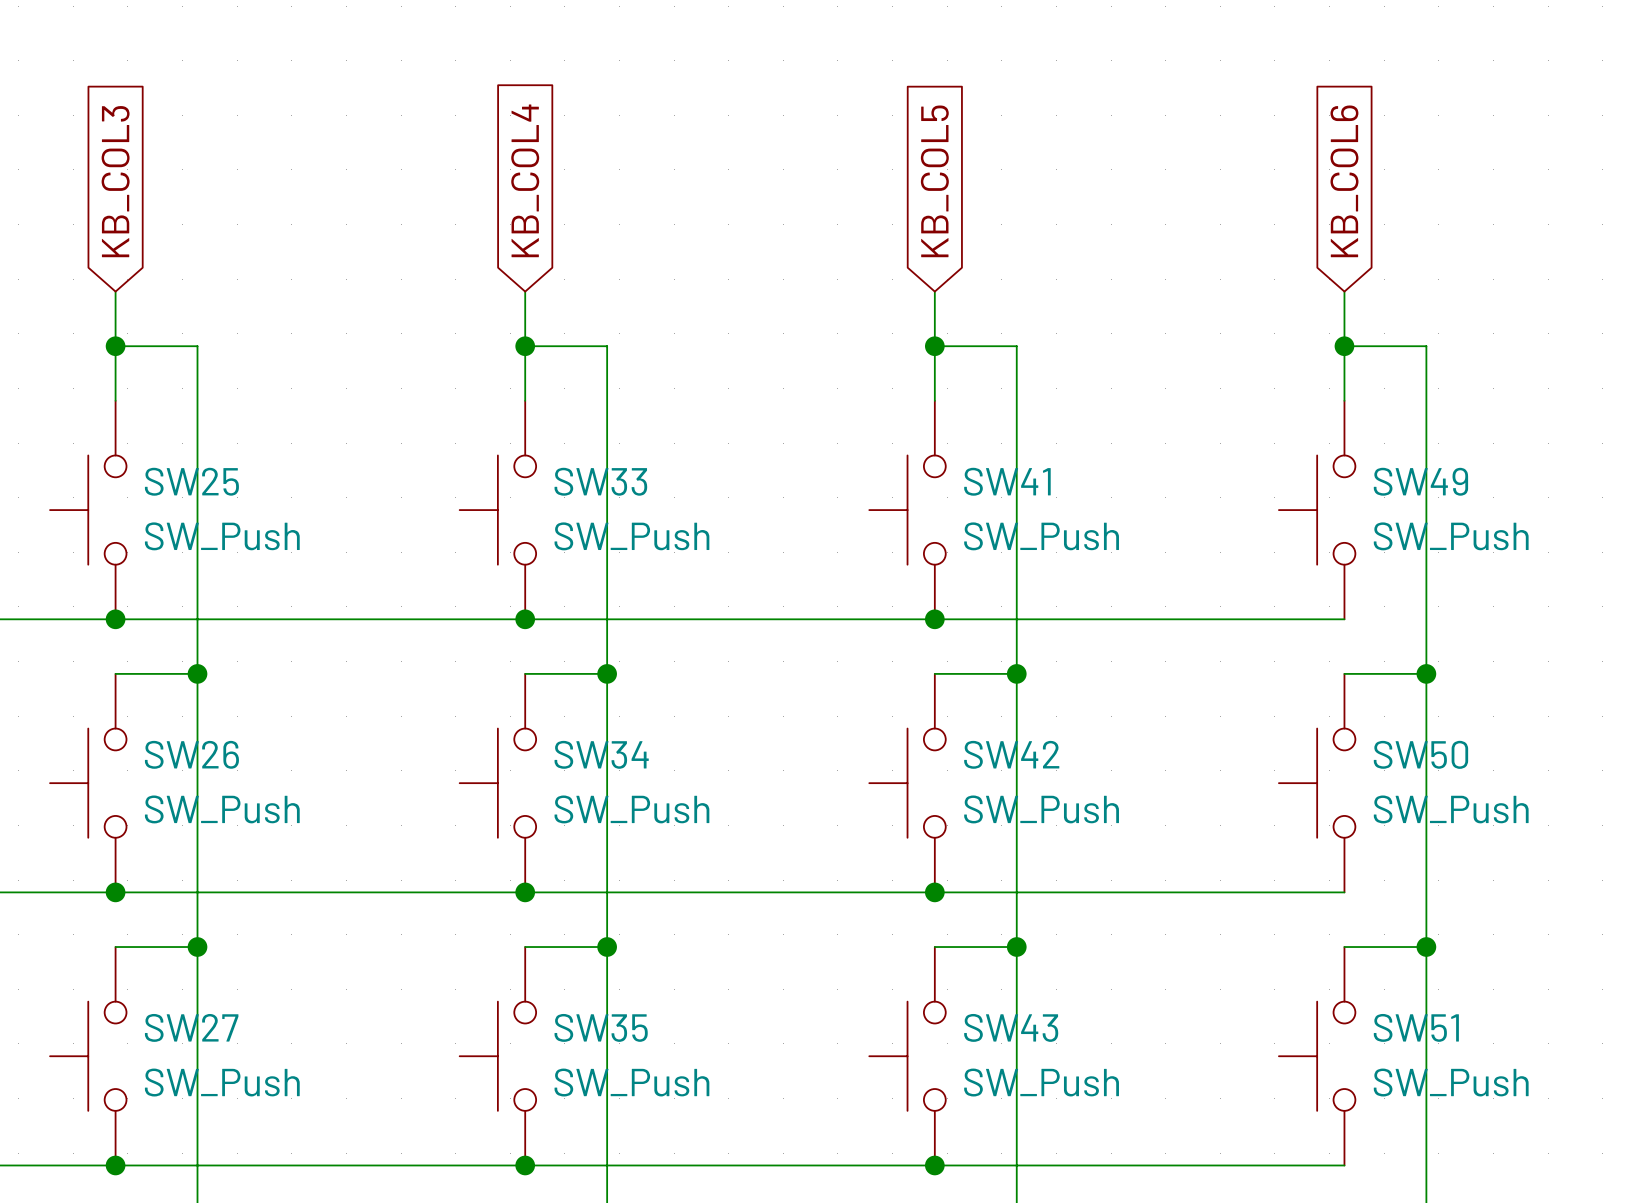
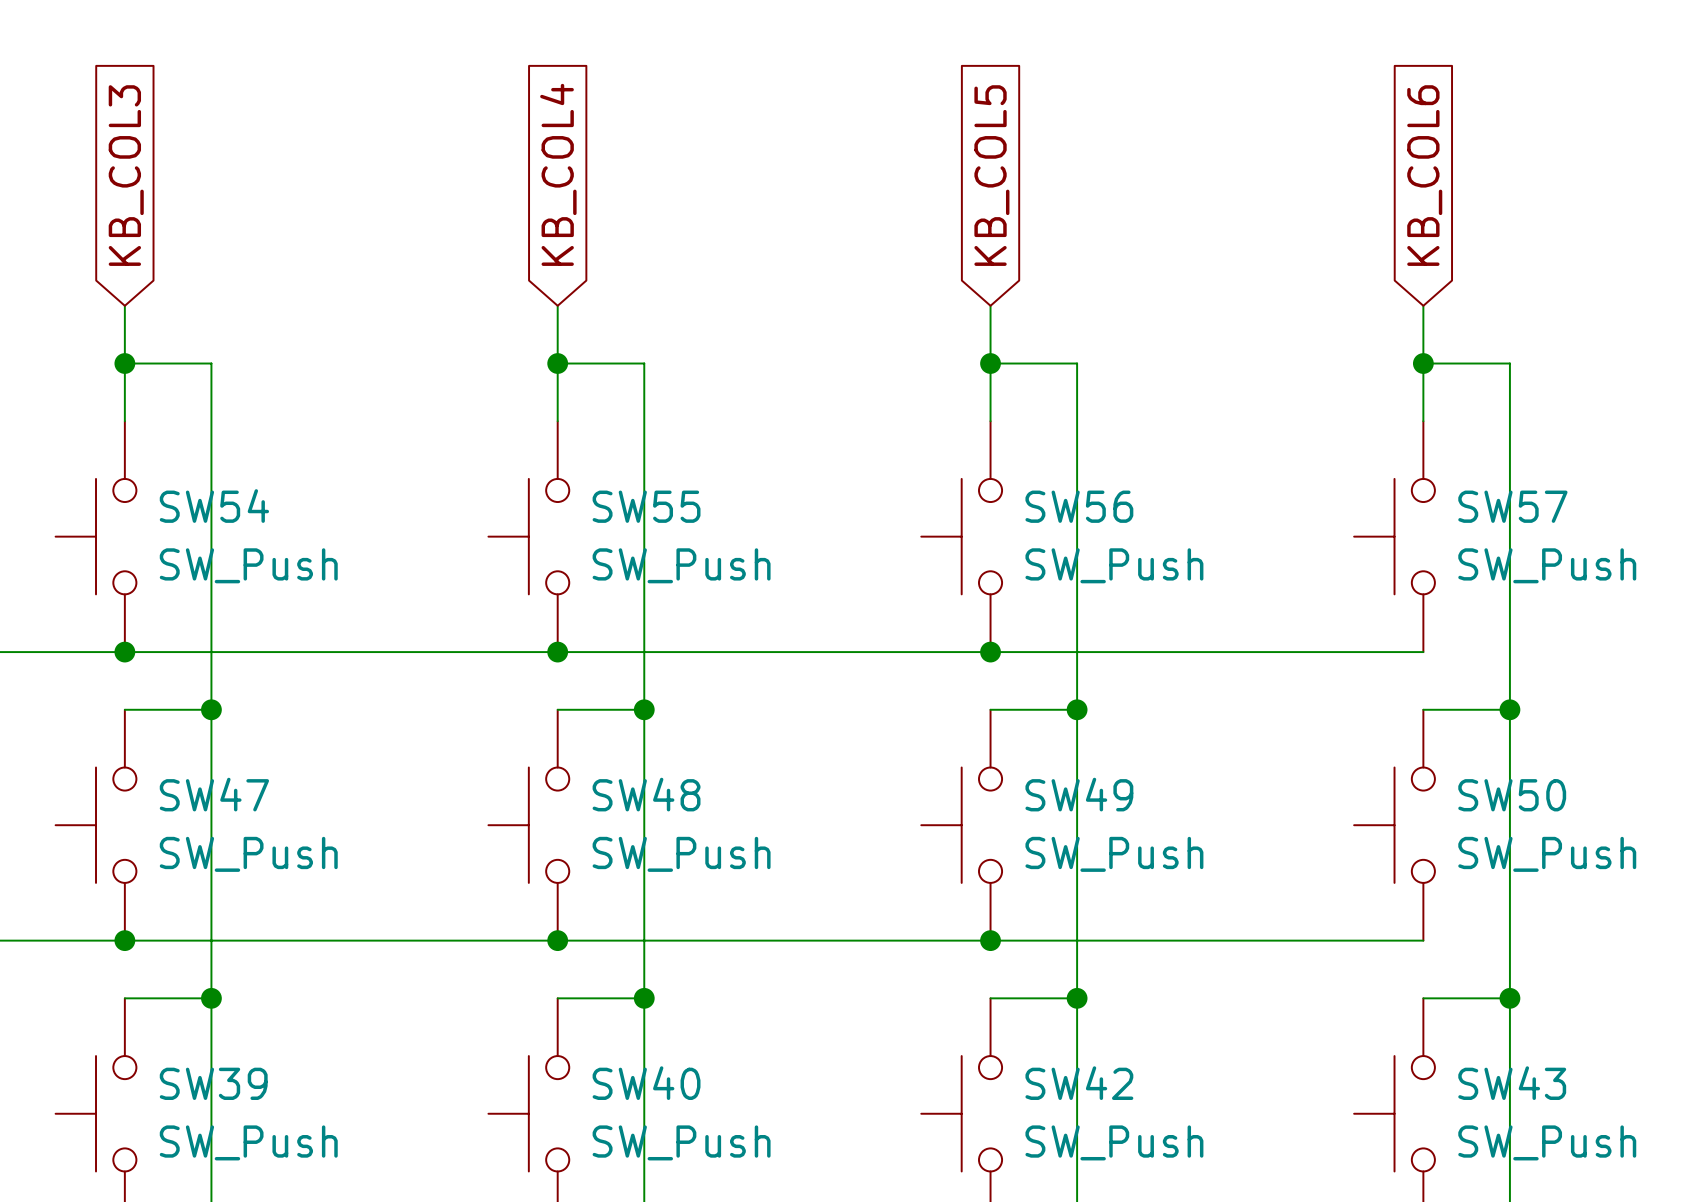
SW25 name: SW25 (191, 481) -> SW54 (214, 506)
SW33 name: SW33 (600, 481) -> SW55 (646, 506)
SW41 name: SW41 (1007, 481) -> SW56 (1079, 506)
SW49 name: SW49 (1420, 481) -> SW57 (1512, 506)
SW26 name: SW26 (191, 754) -> SW47 (214, 794)
SW34 name: SW34 (601, 754) -> SW48 (646, 794)
SW42 name: SW42 (1011, 754) -> SW49 (1079, 794)
SW27 name: SW27 (191, 1027) -> SW39 (213, 1083)
SW35 name: SW35 (601, 1027) -> SW40 (646, 1083)
SW43 name: SW43 (1011, 1027) -> SW42 (1079, 1083)
SW51 name: SW51 (1416, 1027) -> SW43 (1512, 1083)

